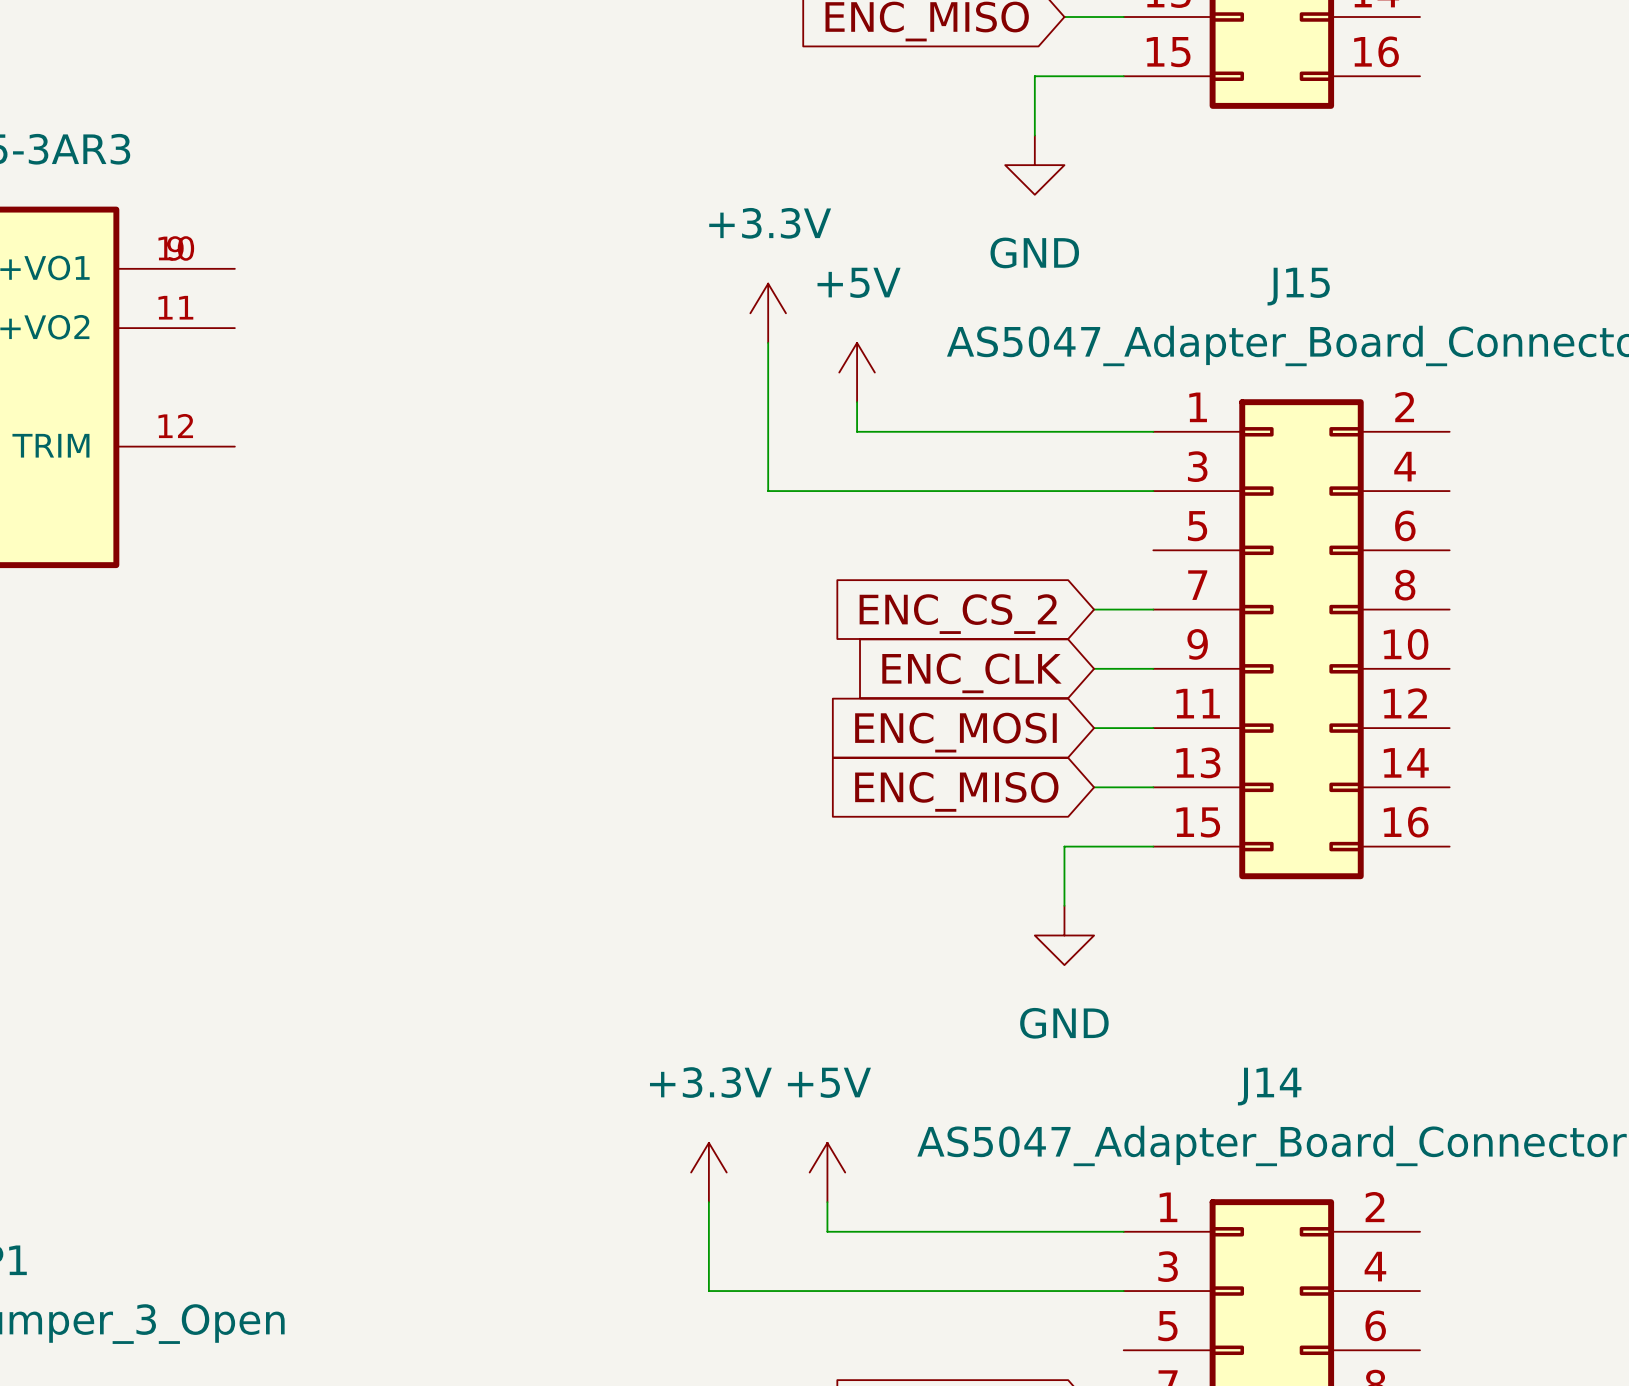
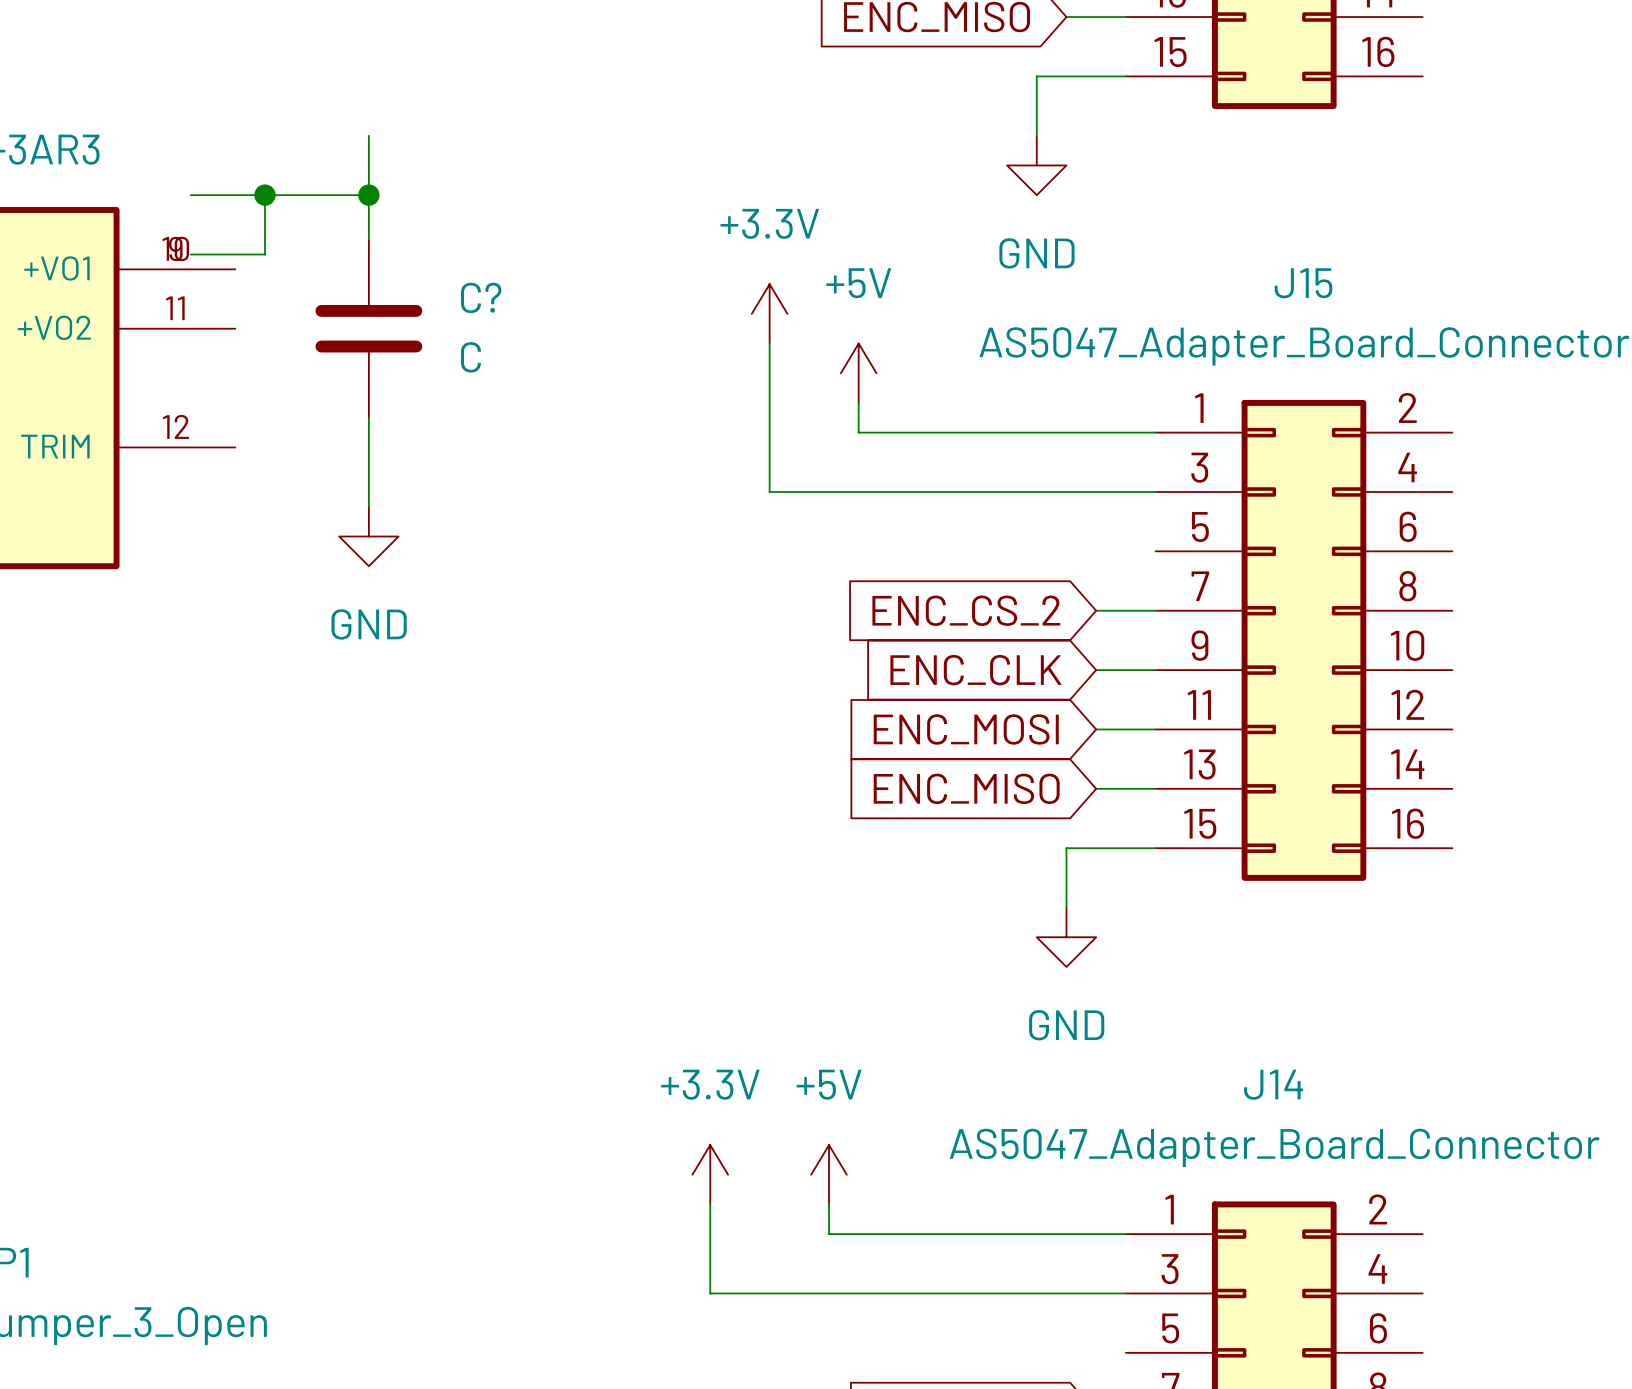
wire: none -> (368, 135) (368, 239)
wire: none -> (190, 195) (368, 195)
wire: none -> (264, 195) (264, 254) (190, 254)
junction: none -> (264, 195)
junction: none -> (368, 195)
C?: none -> C (368, 328)
wire: none -> (368, 417) (368, 506)
power symbol: none -> GND (368, 536)

